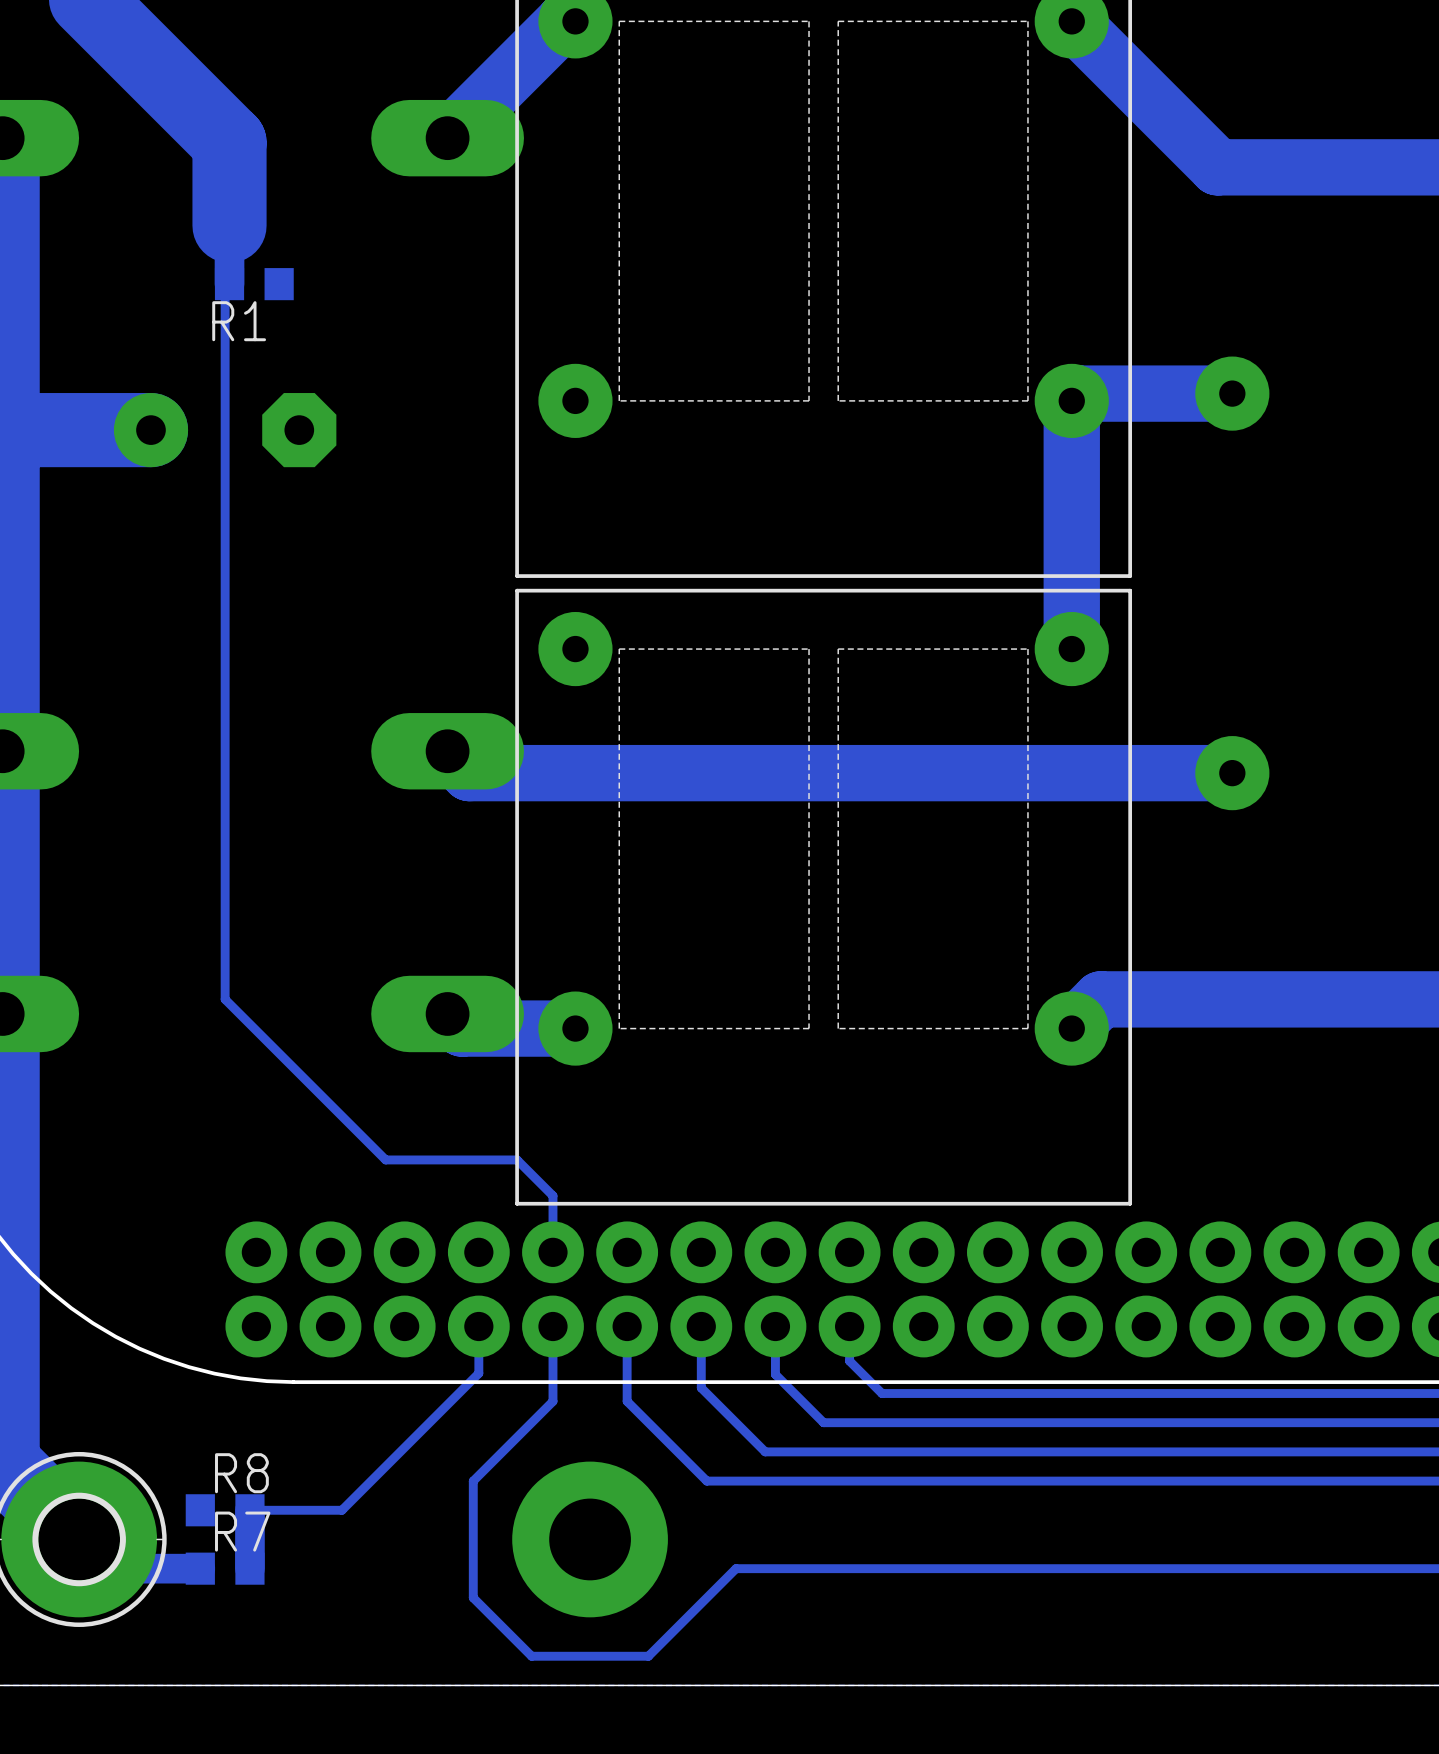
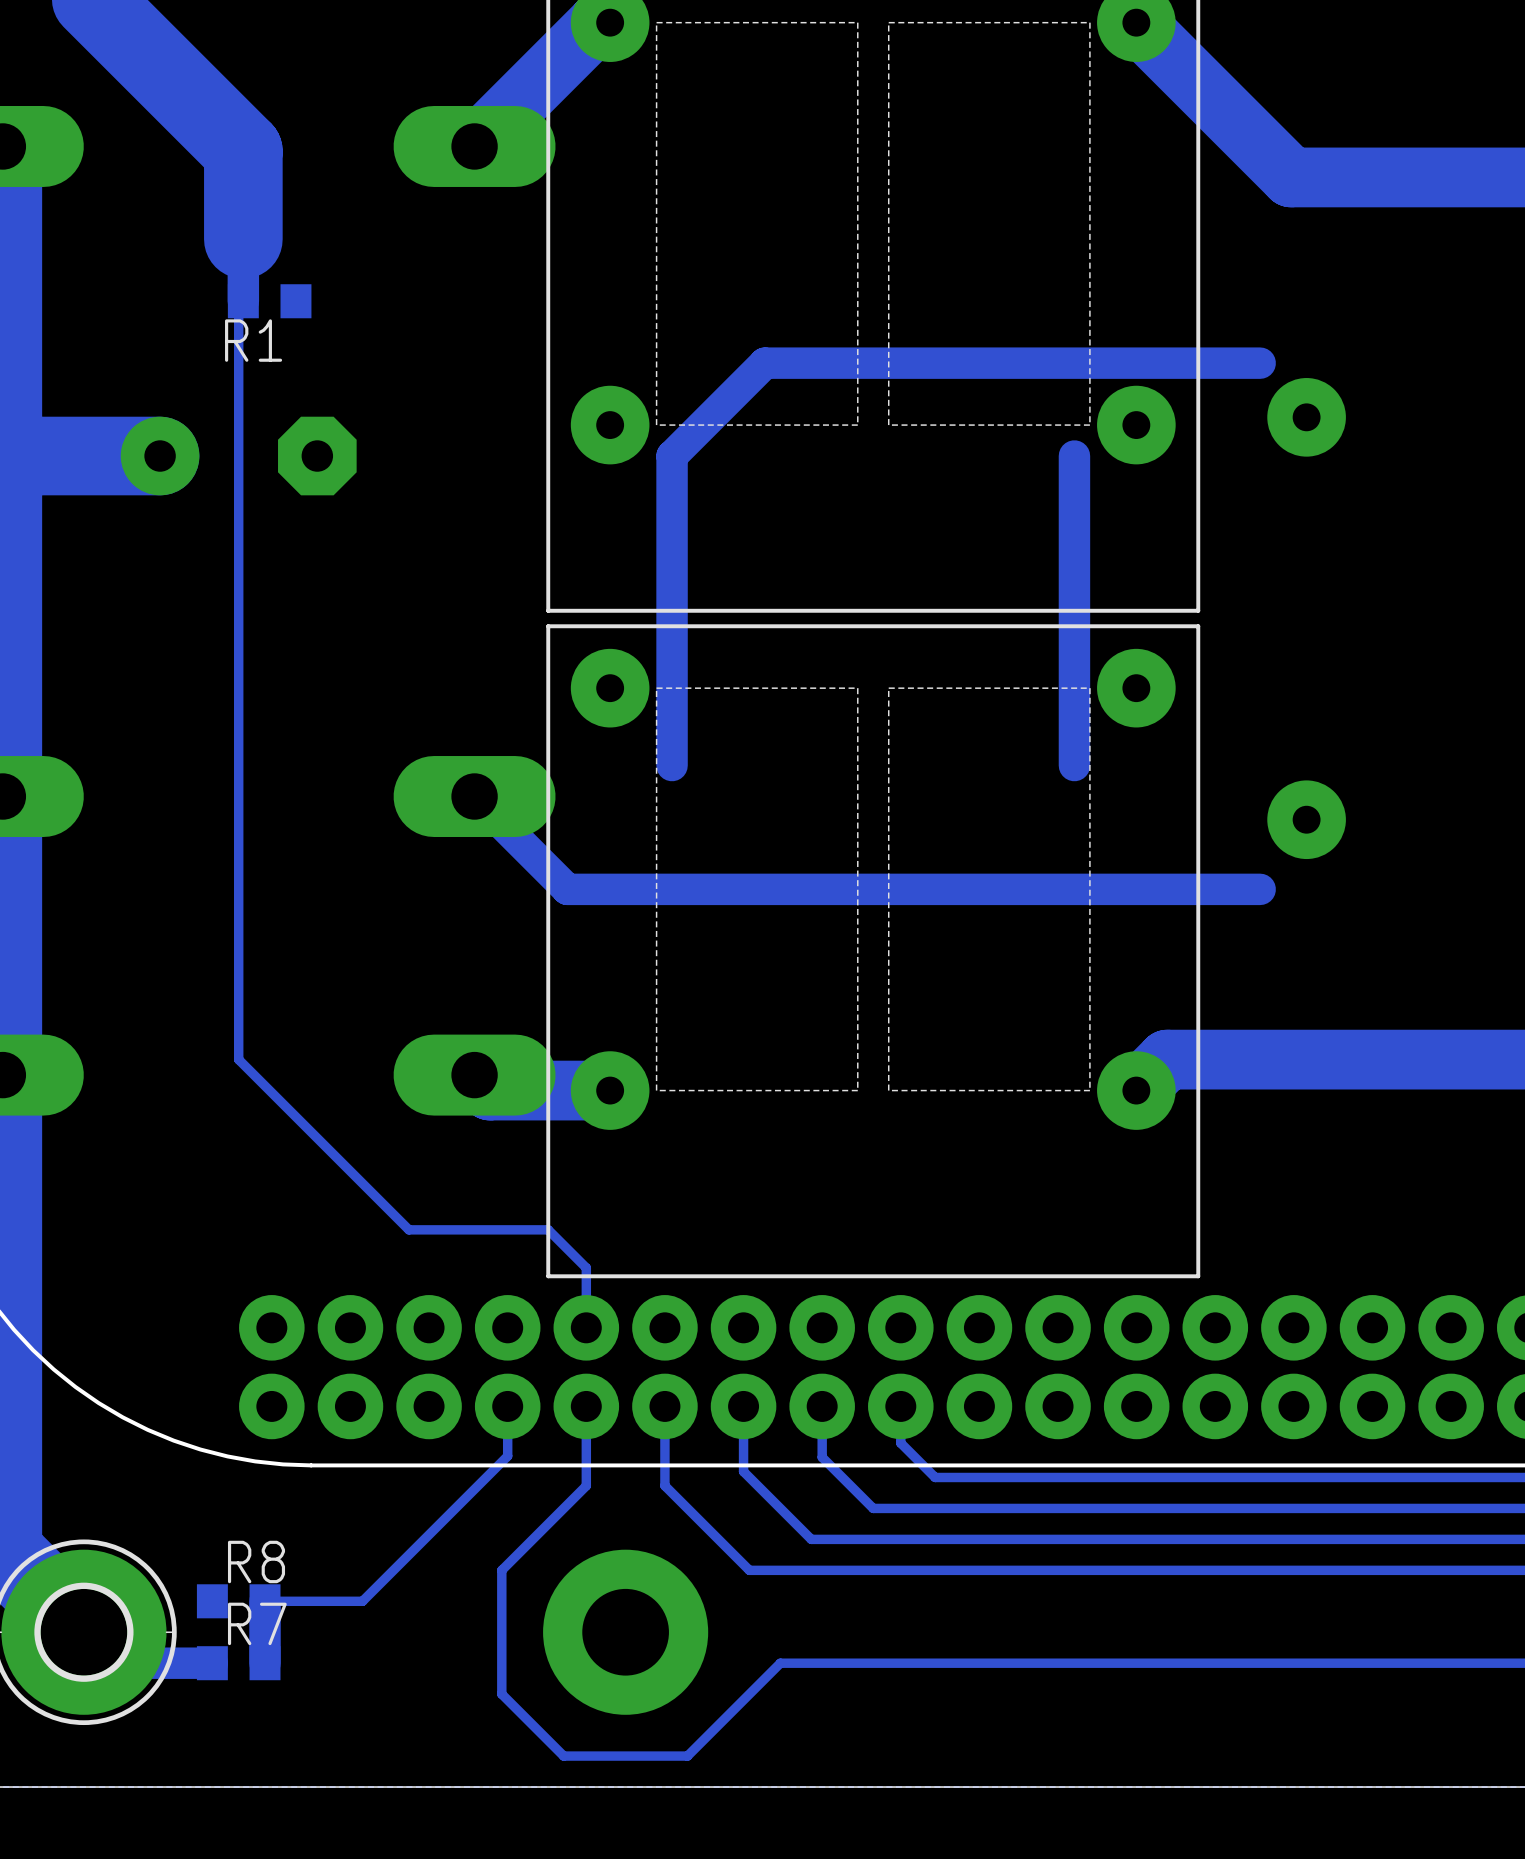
track: none -> (1260, 363) (764, 363) (672, 456) (672, 765)
track: (1232, 393) (1079, 393) (1071, 400) (1071, 649) -> none
track: none -> (1074, 456) (1074, 765)
track: (1232, 773) (469, 773) -> (1260, 889) (567, 889) (497, 819)

